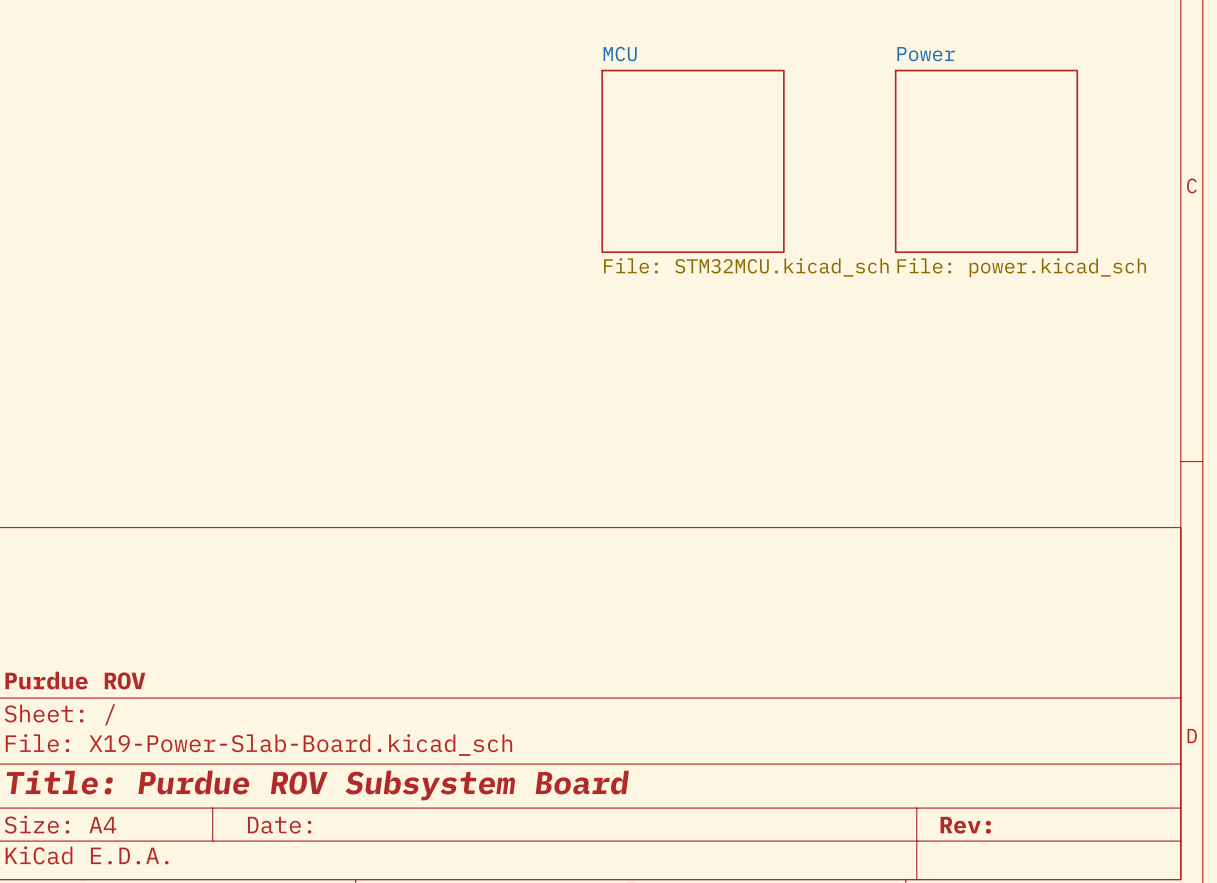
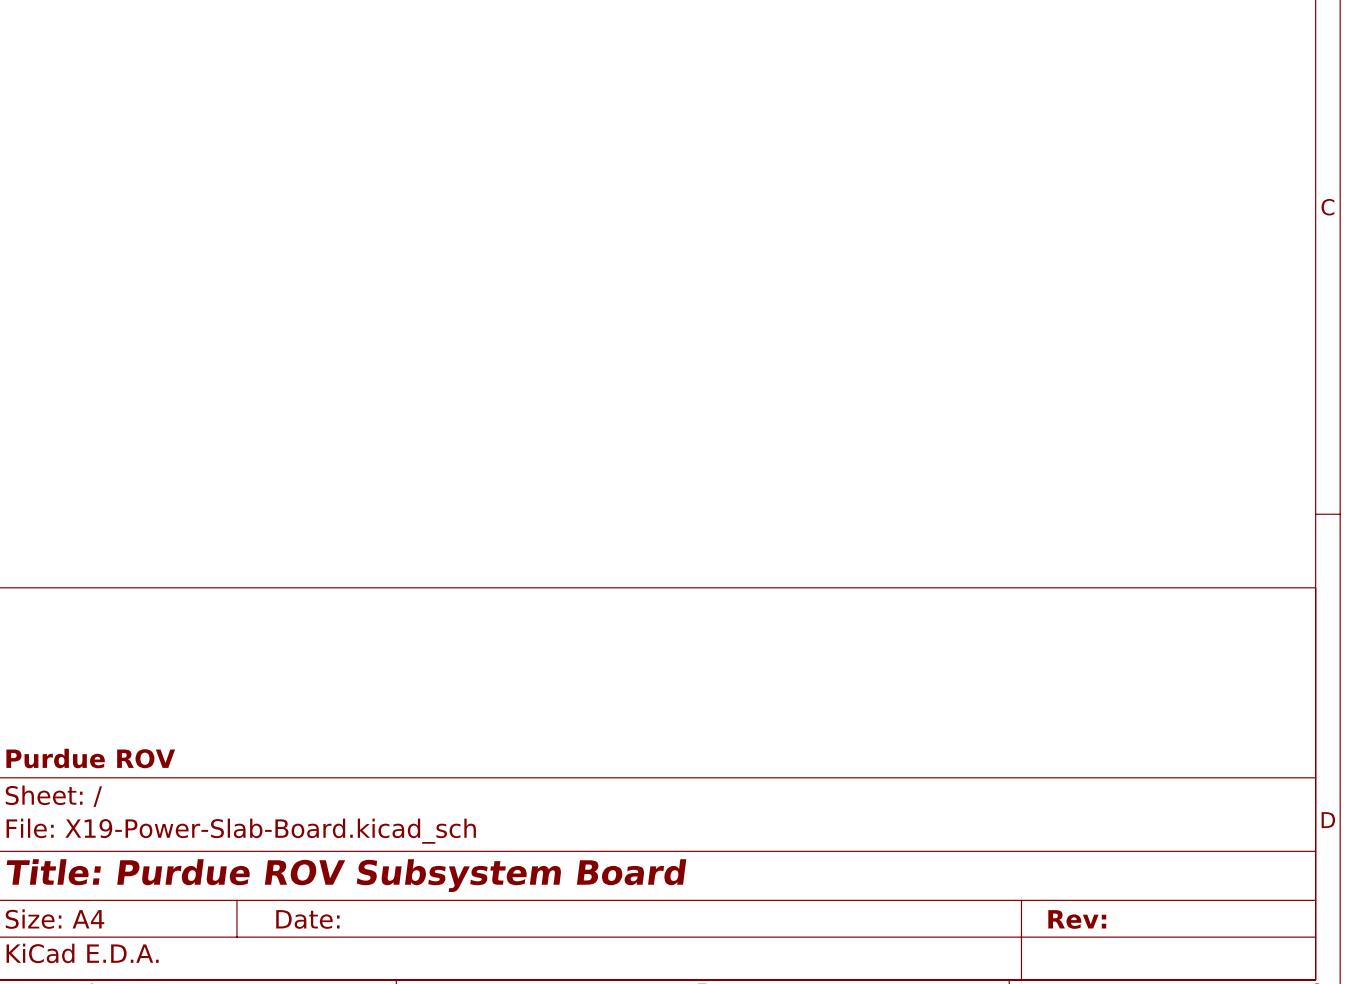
sheet MCU: File: STM32MCU.kicad_sch (693, 161) -> none
sheet Power: File: power.kicad_sch (986, 161) -> none

